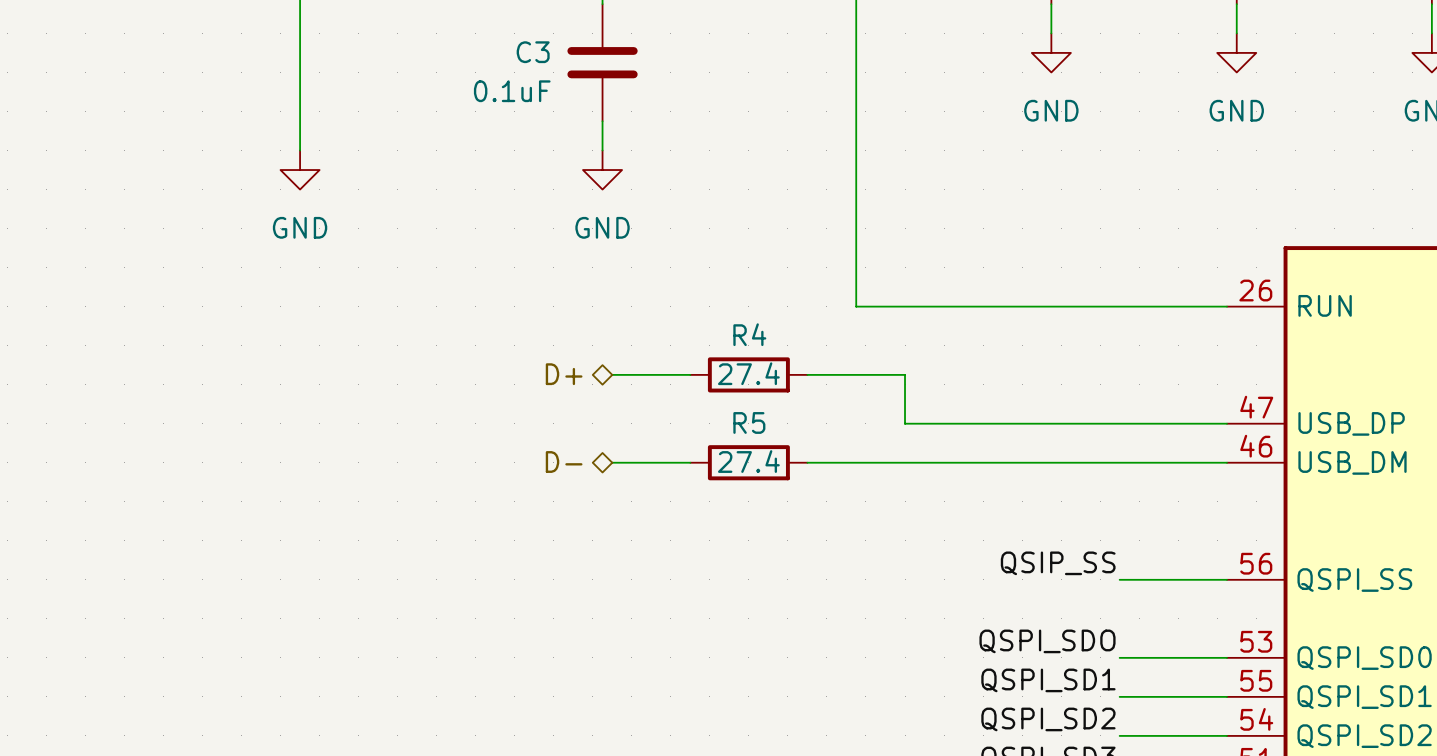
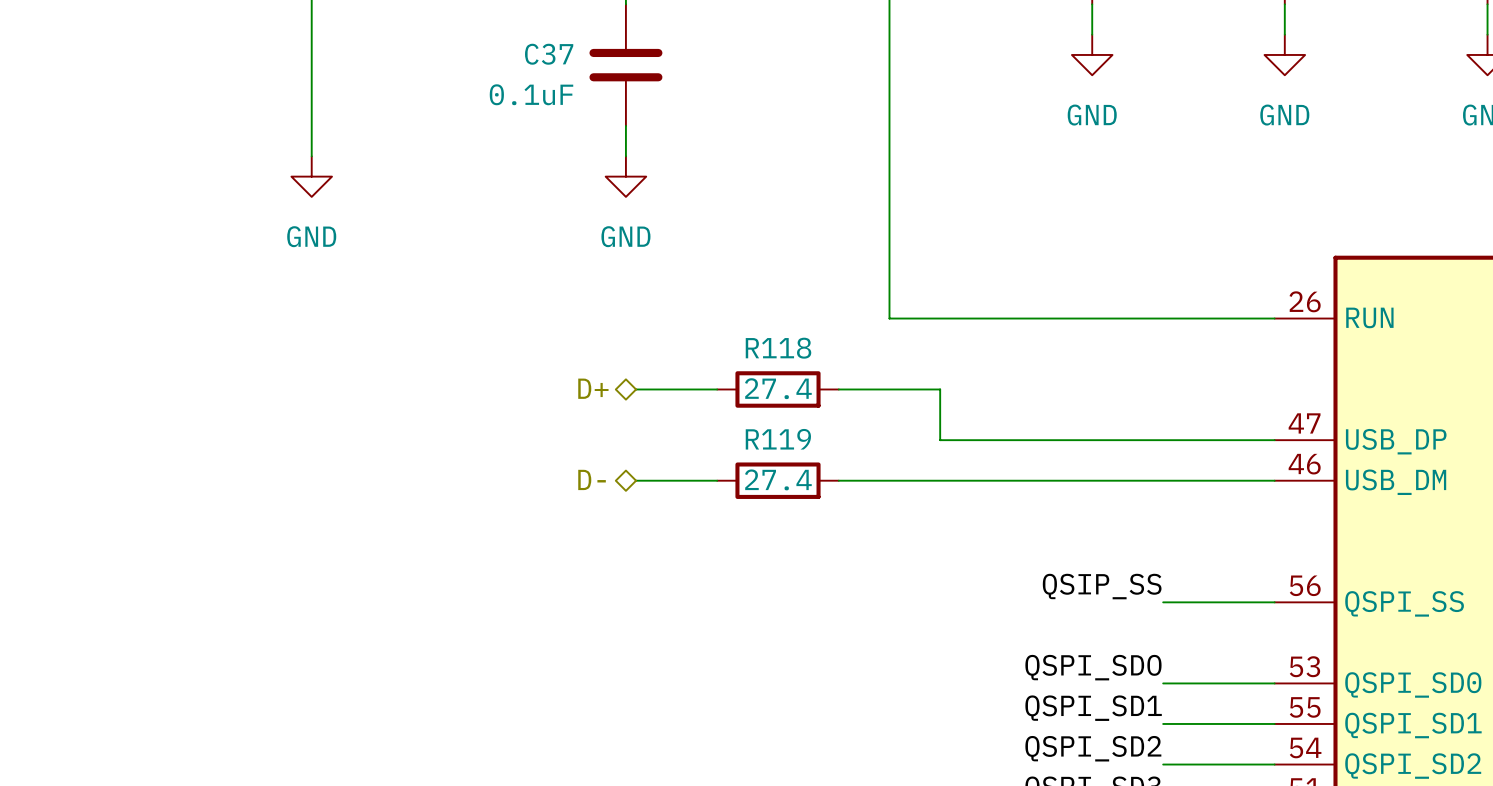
C3 name: C3 (533, 52) -> C37 (549, 54)
R4 name: R4 (749, 334) -> R118 (778, 348)
R5 name: R5 (749, 422) -> R119 (778, 439)

